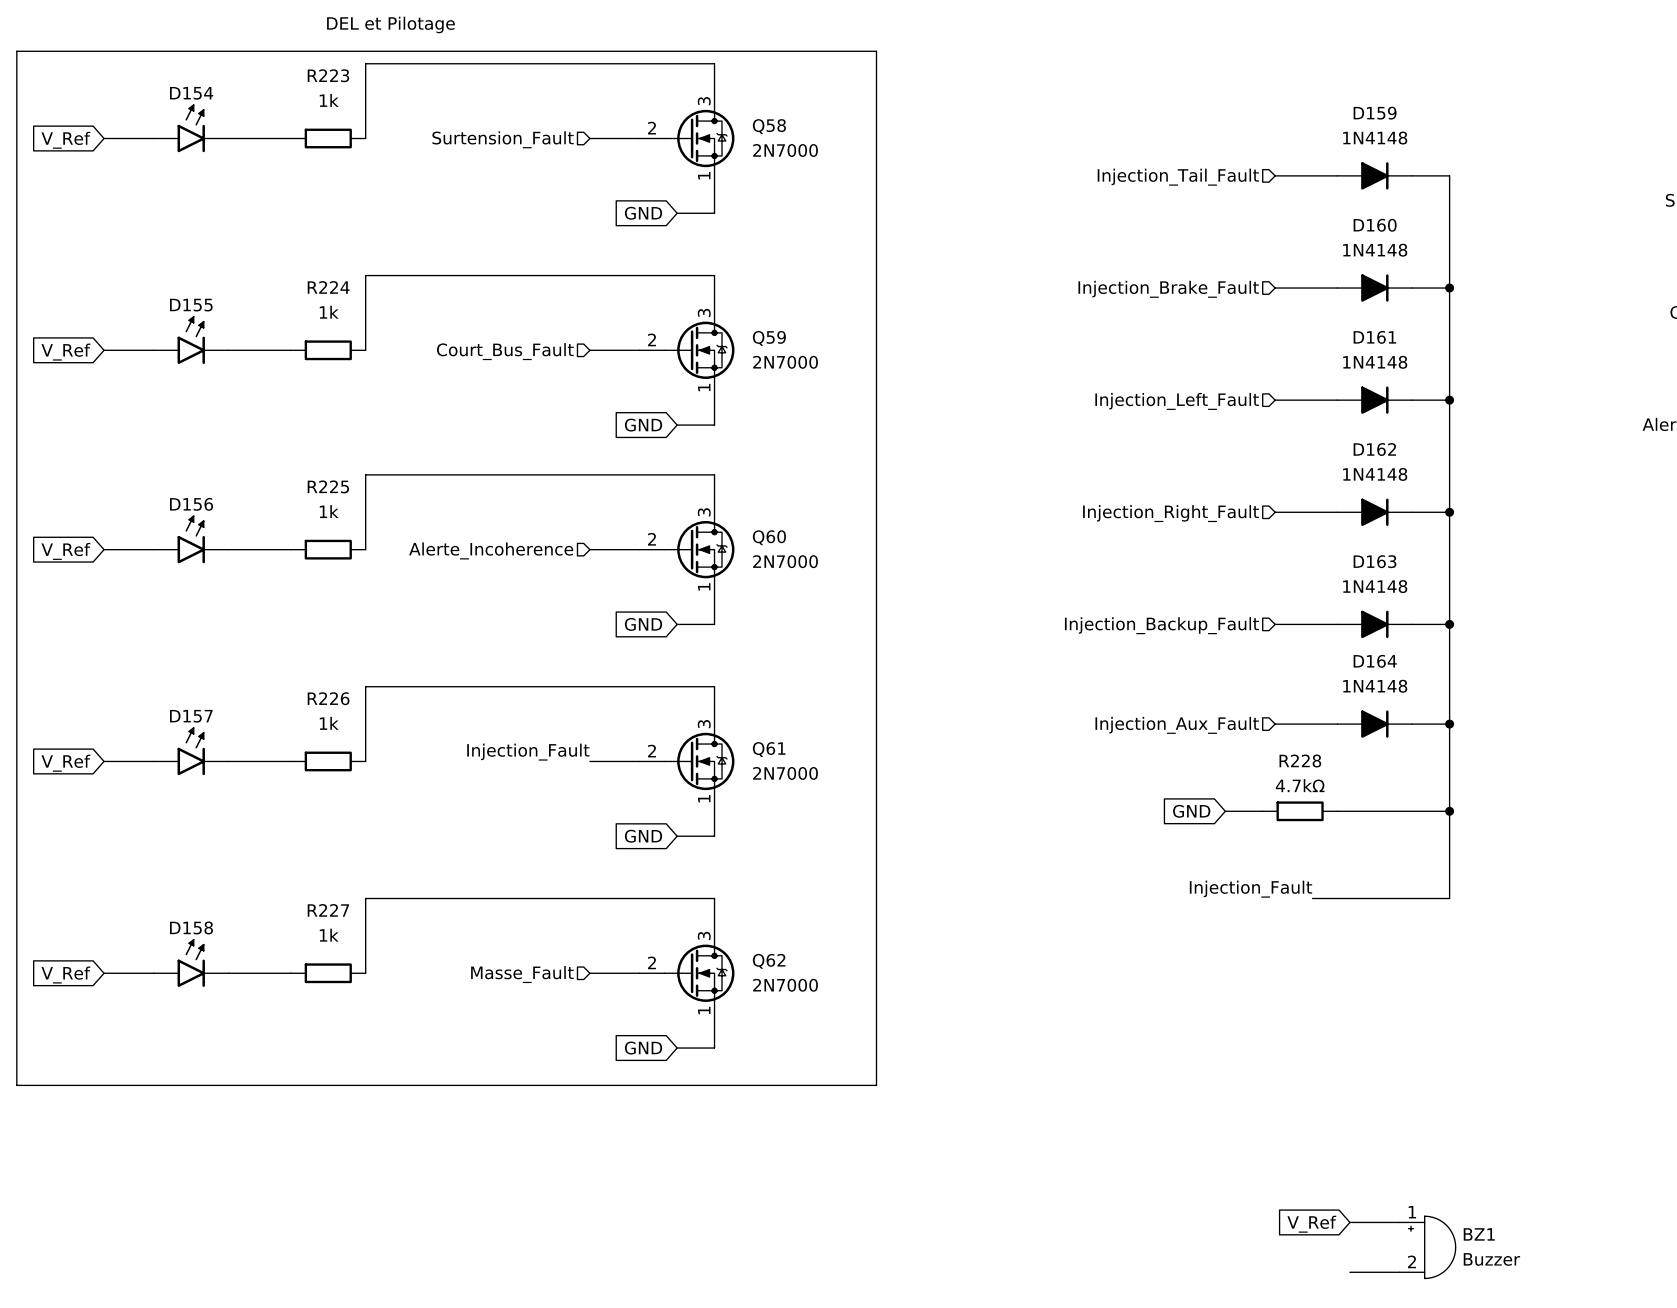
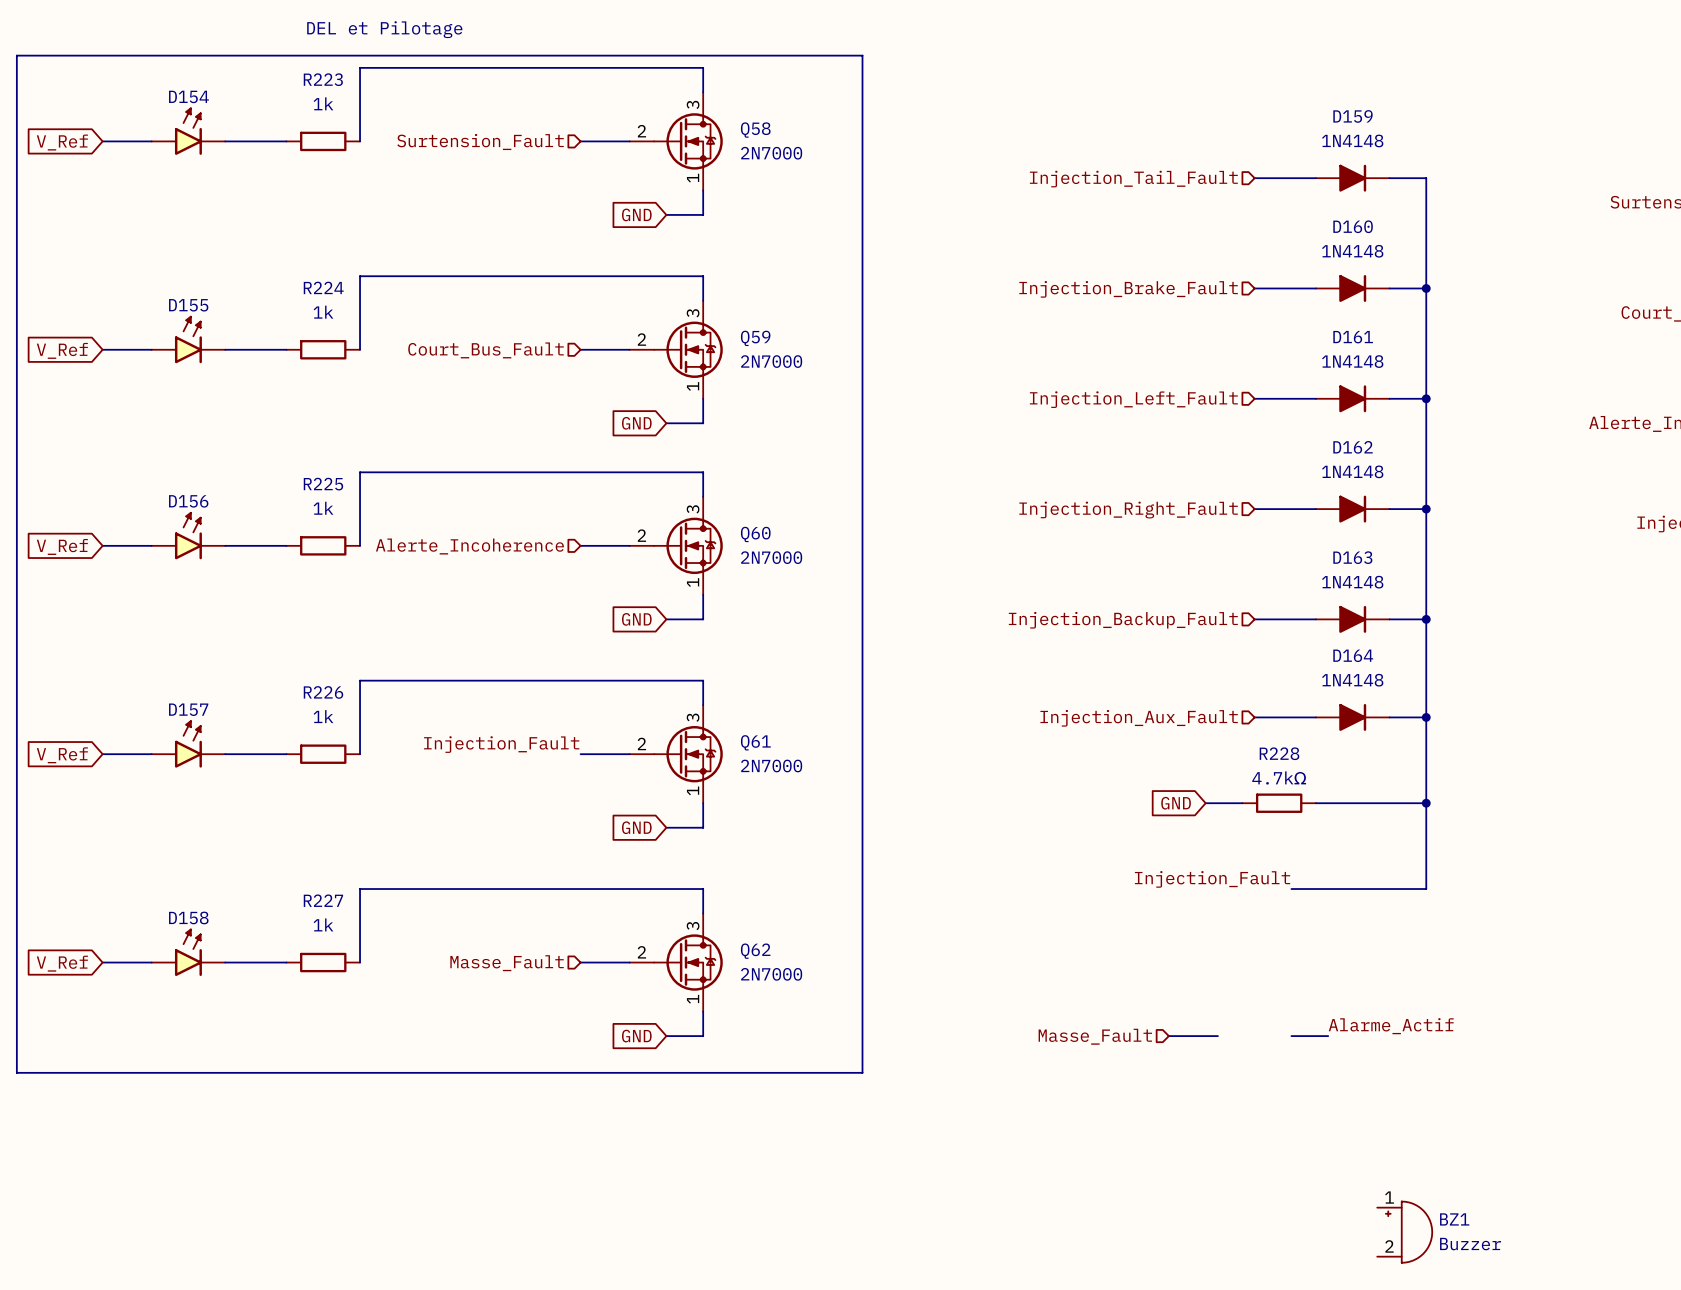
label: none -> Alarme_Actif (1391, 1026)
wire: none -> (1291, 1036) (1328, 1036)
hierarchical label: none -> Masse_Fault (1095, 1036)
wire: (1349, 1222) (1399, 1222) -> (1168, 1036) (1217, 1036)
global label: V_Ref (1311, 1224) -> none
wire: (1349, 1272) (1399, 1272) -> none

